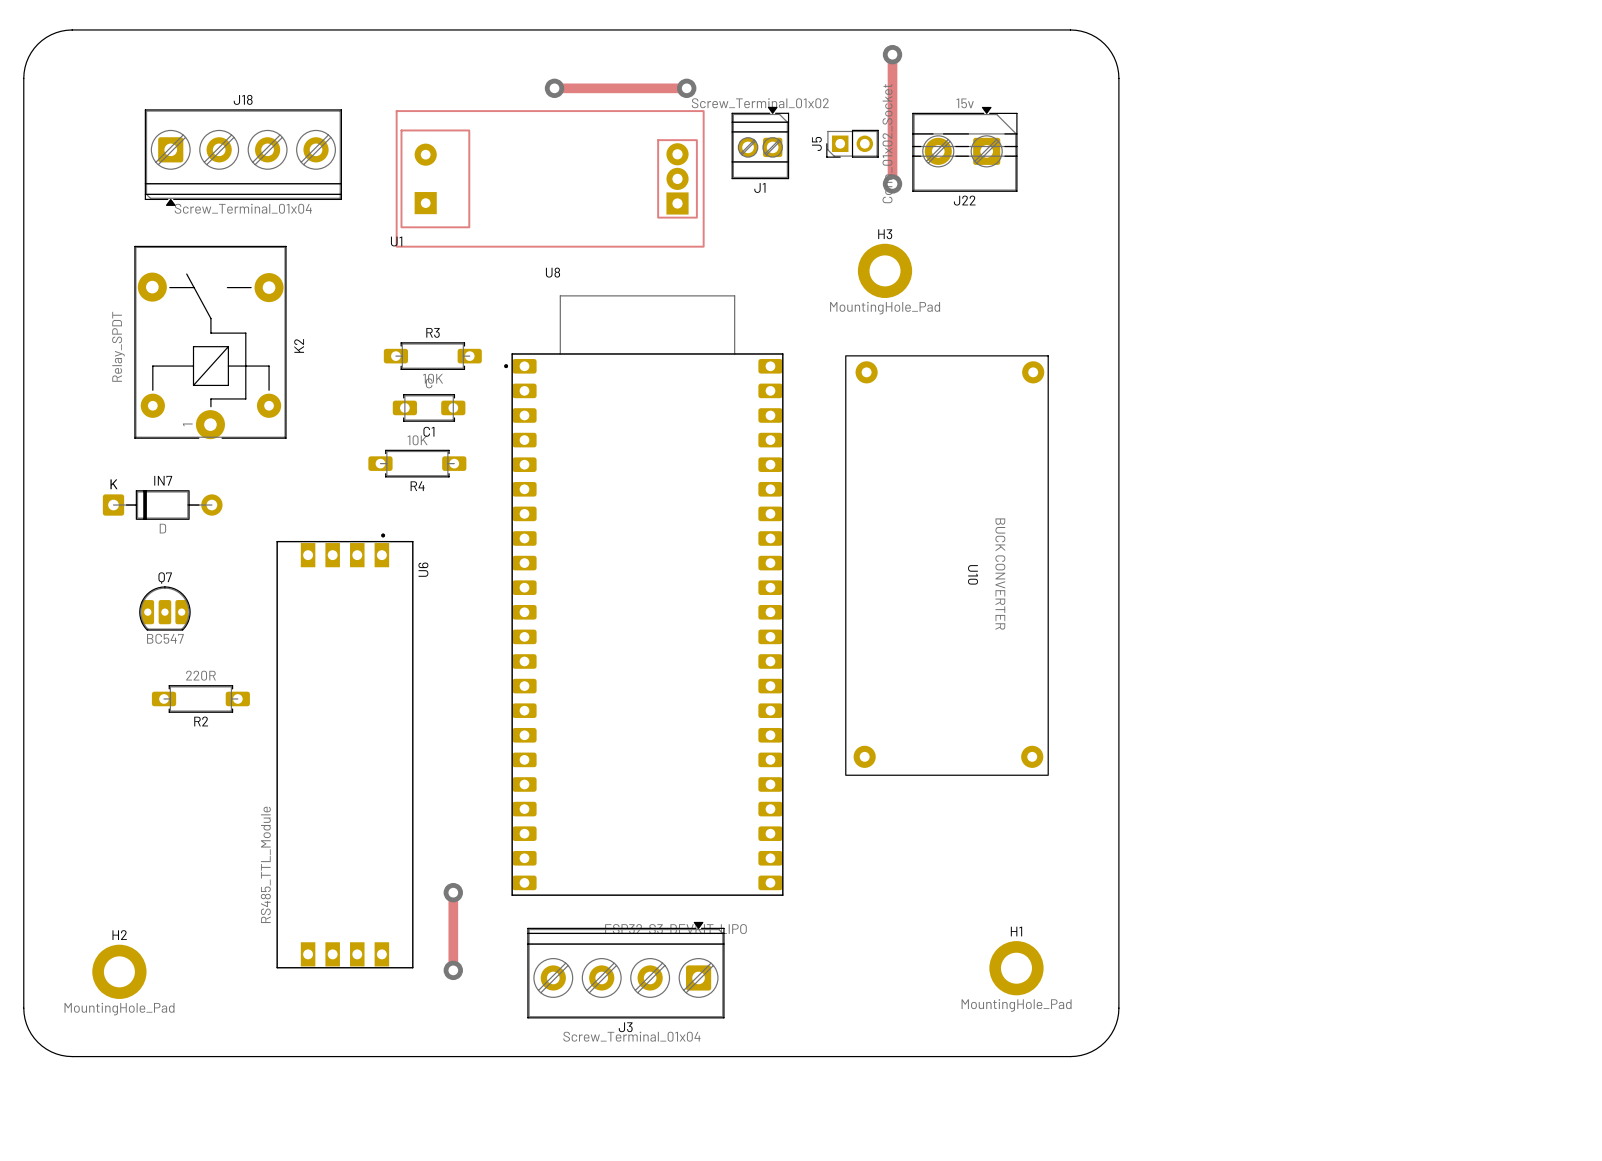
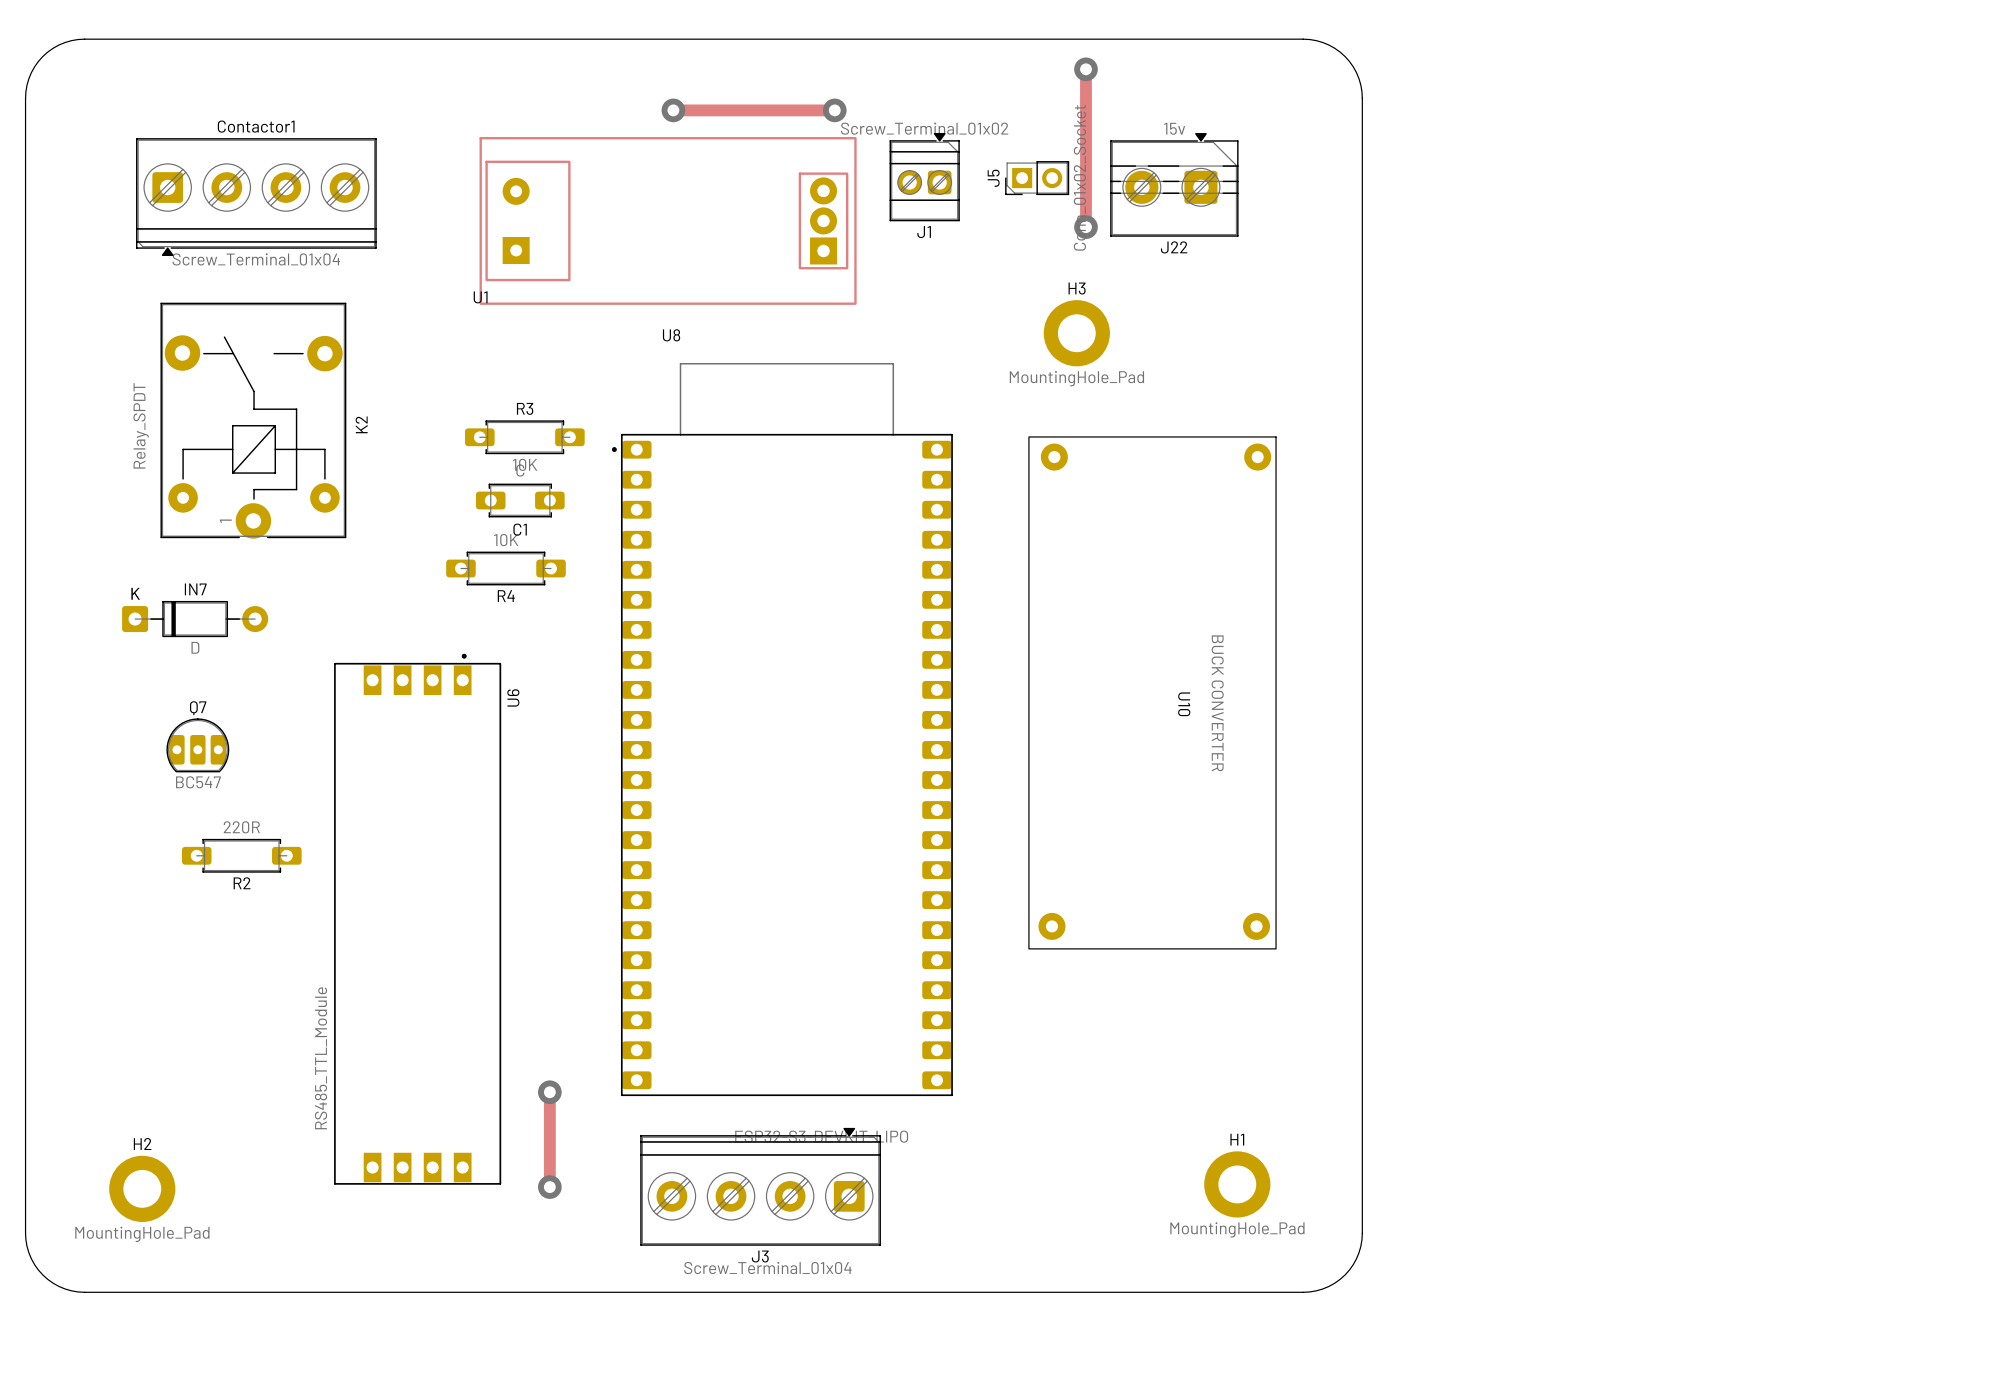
J18: Screw_Terminal_01x04 (243, 157) -> none
Contactor1: none -> Screw_Terminal_01x04 (256, 197)

